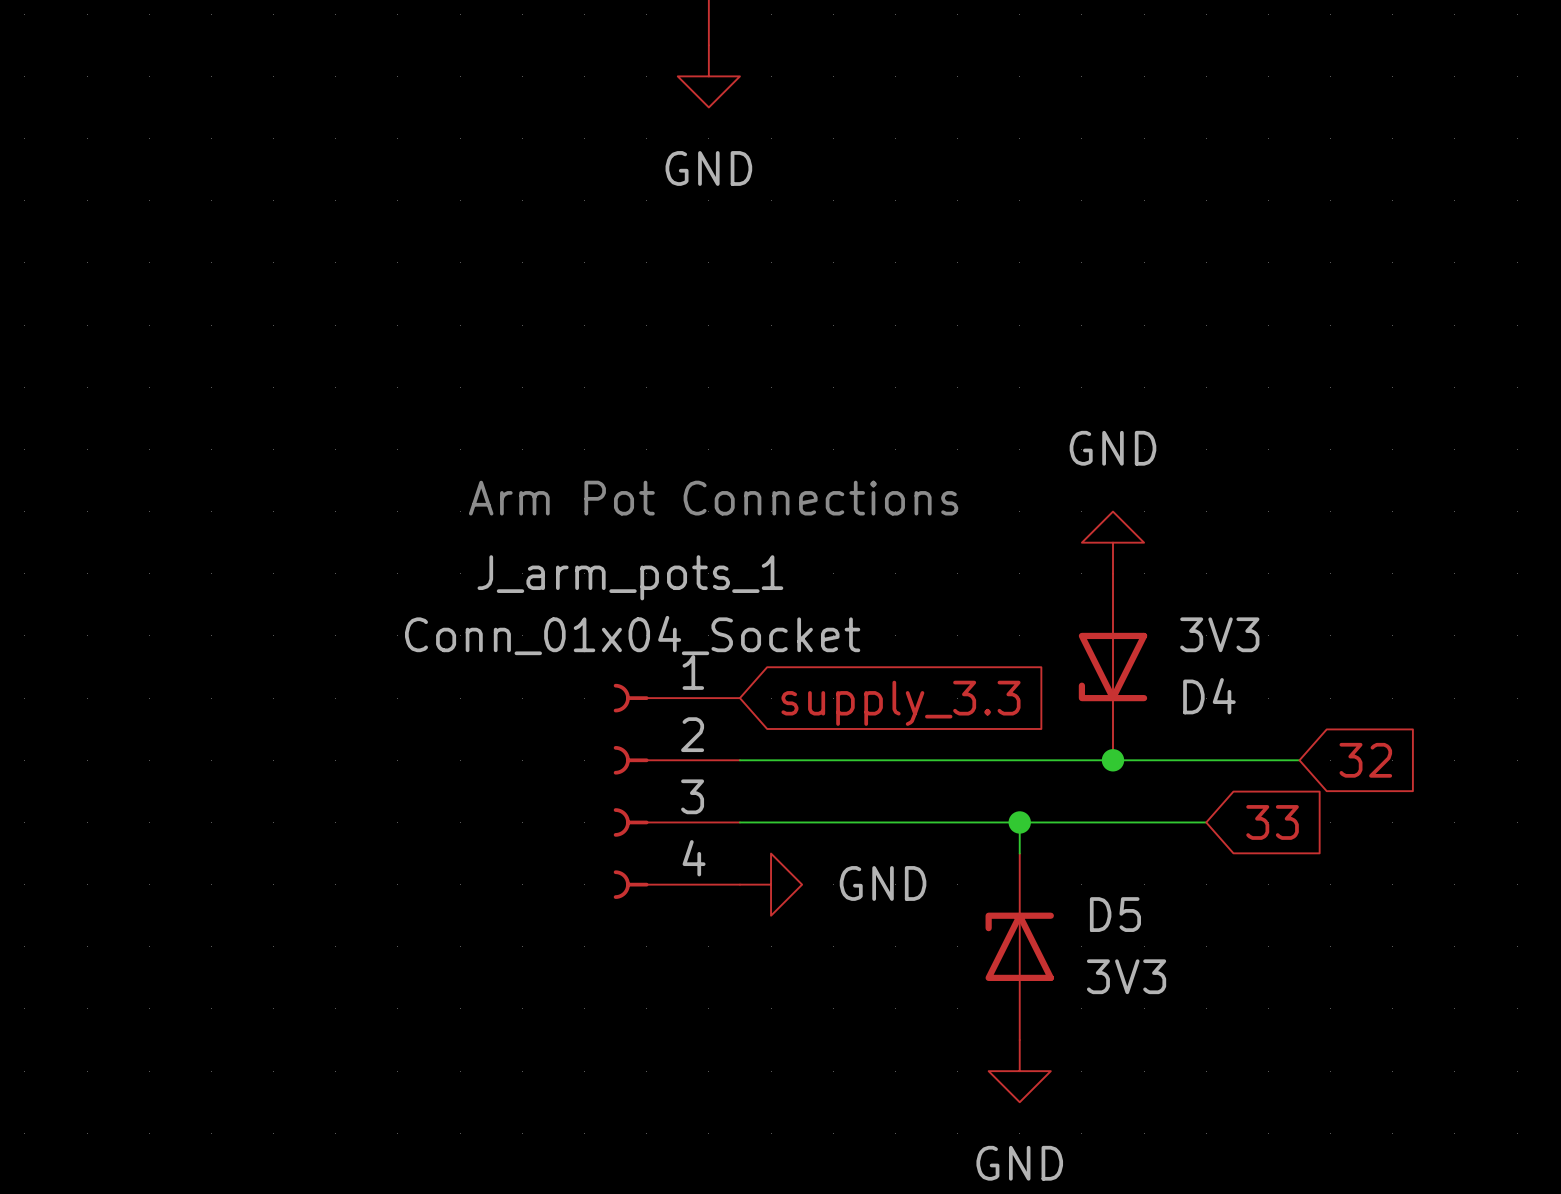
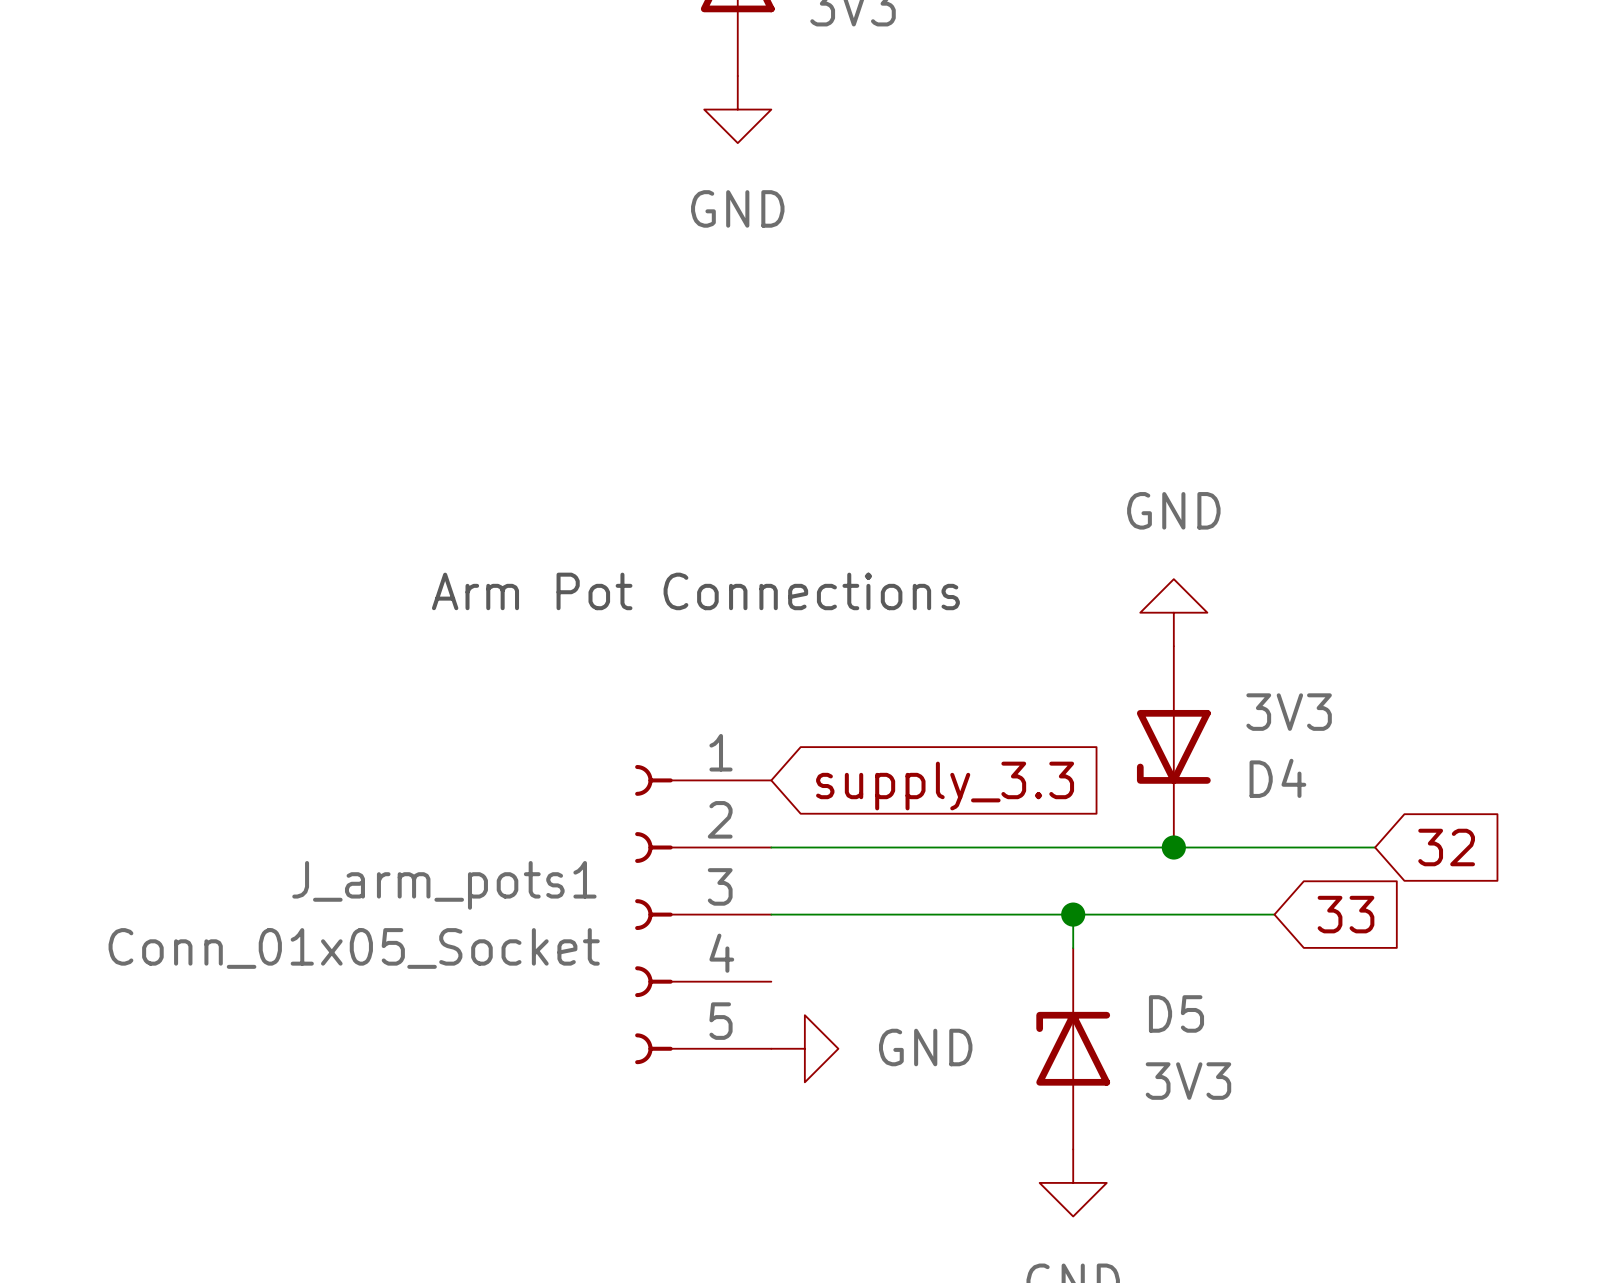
text position: Arm Pot Connections (713, 498) -> Arm Pot Connections (695, 591)
J_arm_pots_1: Conn_01x04_Socket (676, 791) -> none
J_arm_pots1: none -> Conn_01x05_Socket (703, 914)
power symbol position: GND (771, 884) -> GND (804, 1048)

